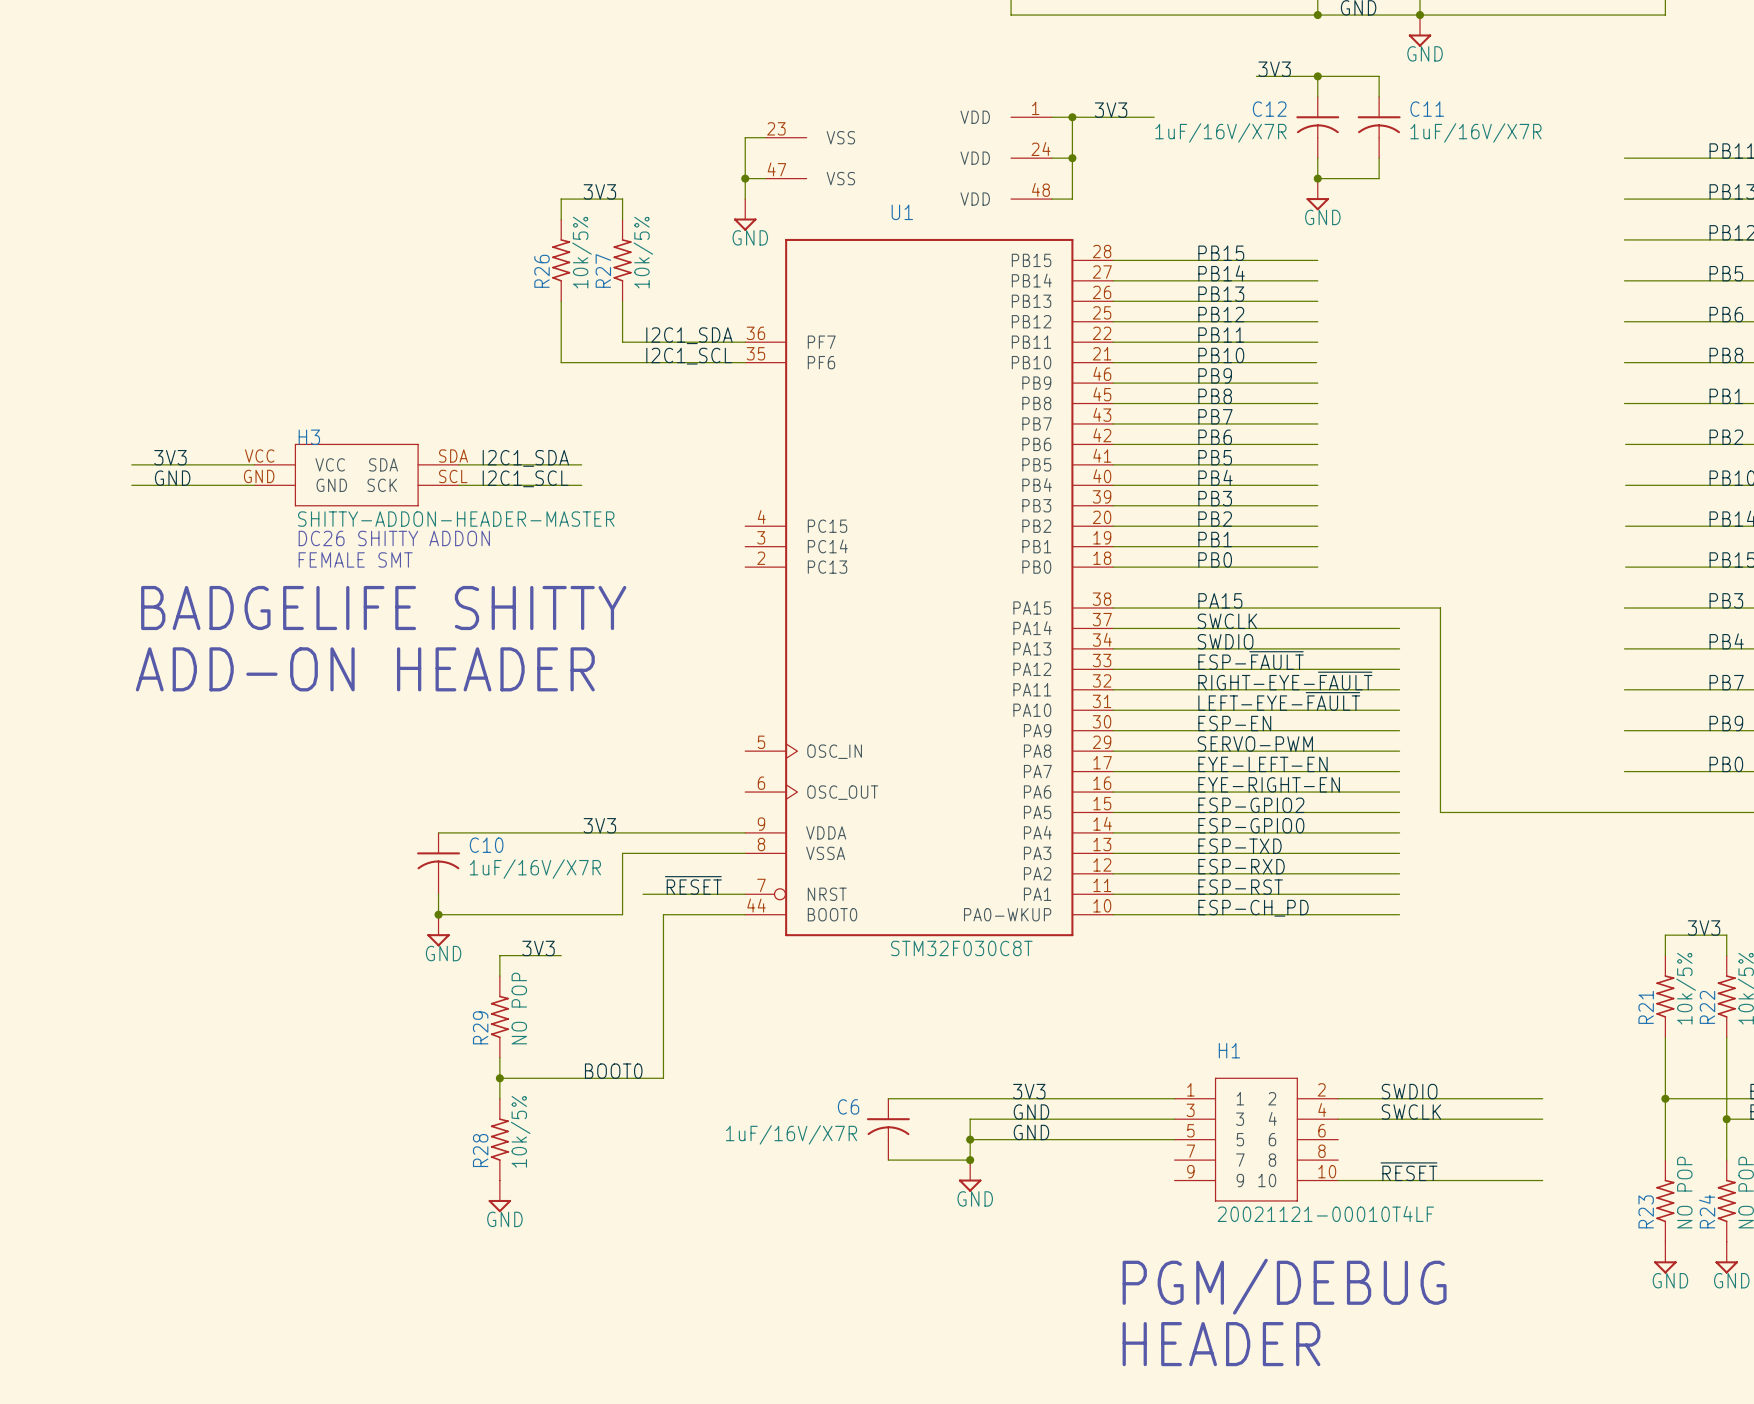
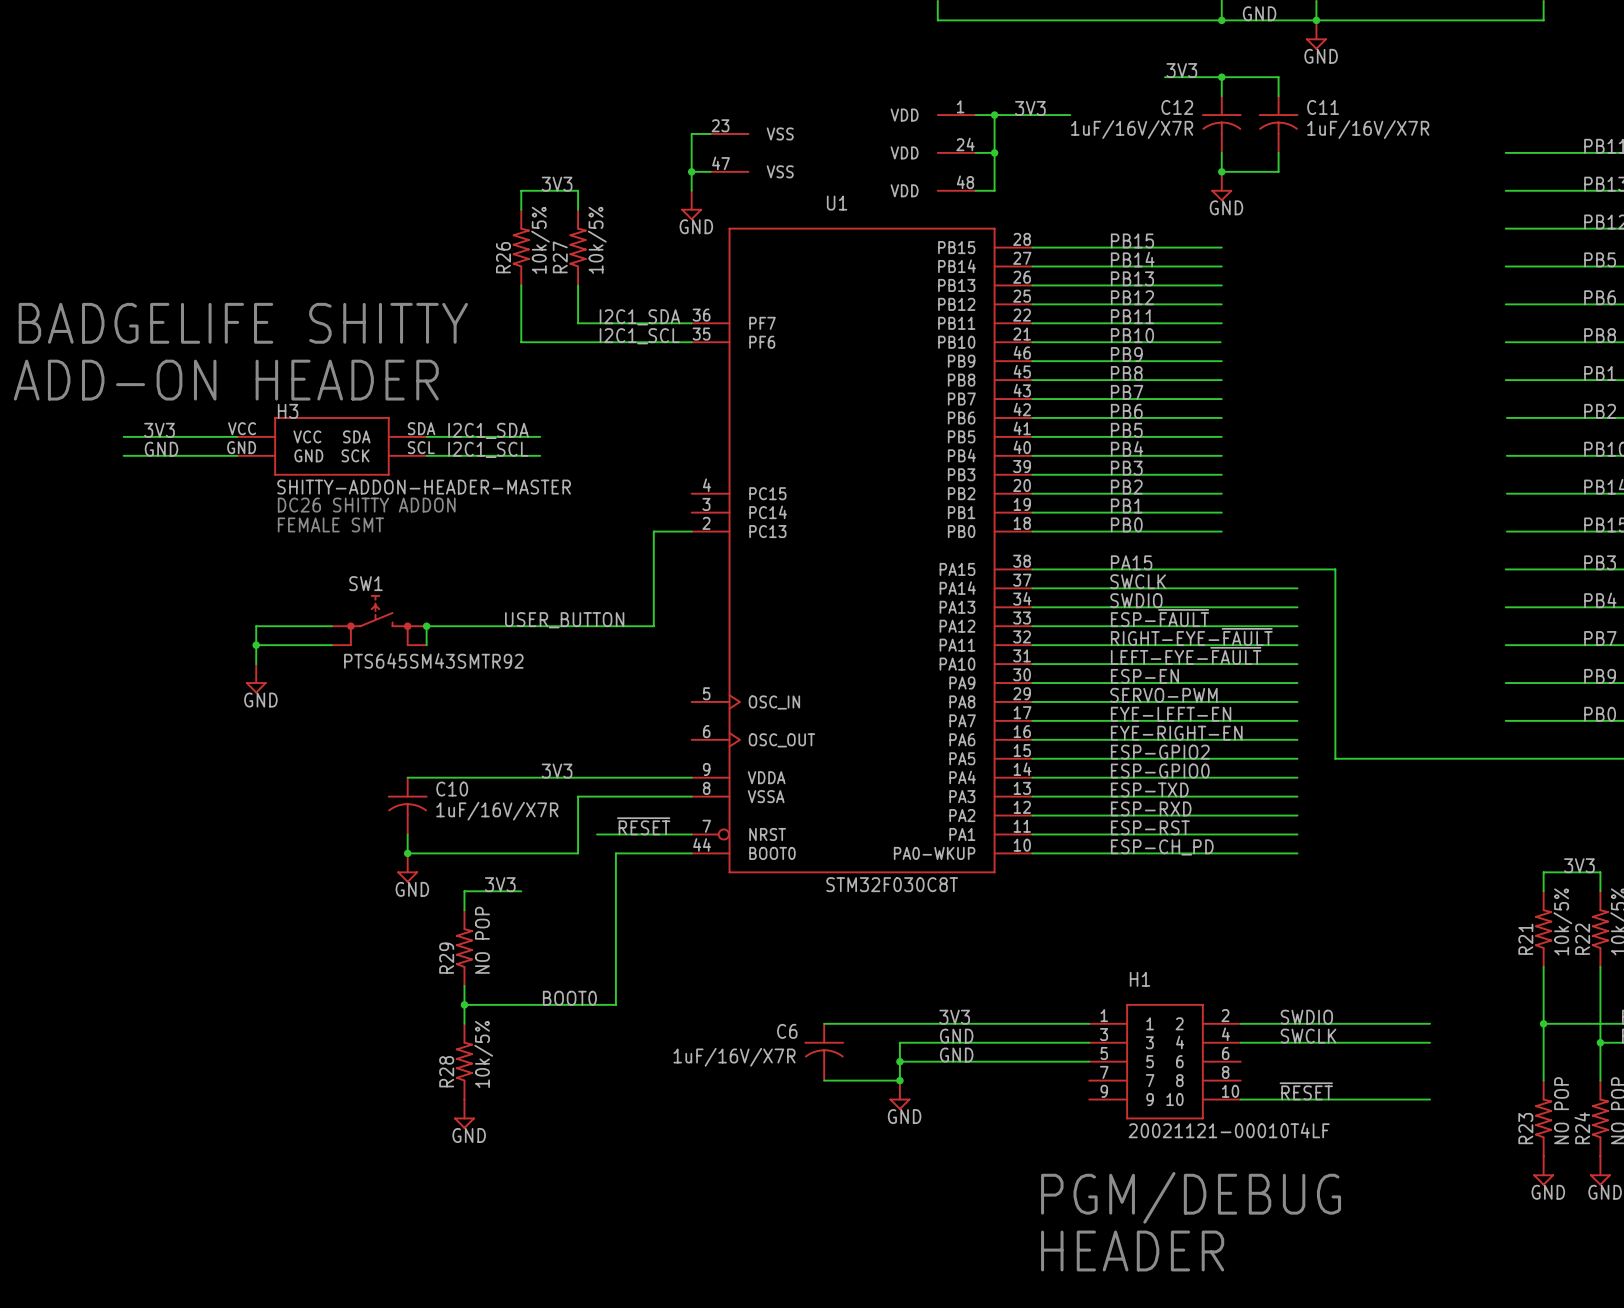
text: none -> BADGELIFE SHITTY (243, 323)
text: none -> ADD-ON HEADER (226, 380)
wire: none -> (691, 531) (653, 531) (653, 626) (426, 626) (426, 645)
text: BADGELIFE SHITTY (383, 608) -> none
label: none -> USER_BUTTON (564, 620)
SW1: none -> PTS645SM43SMTR92 (379, 620)
wire: none -> (331, 626) (256, 626) (256, 664)
text: ADD-ON HEADER (365, 669) -> none
junction: none -> (426, 626)
wire: none -> (256, 645) (331, 645)
junction: none -> (256, 645)
power symbol: none -> GND (256, 678)

